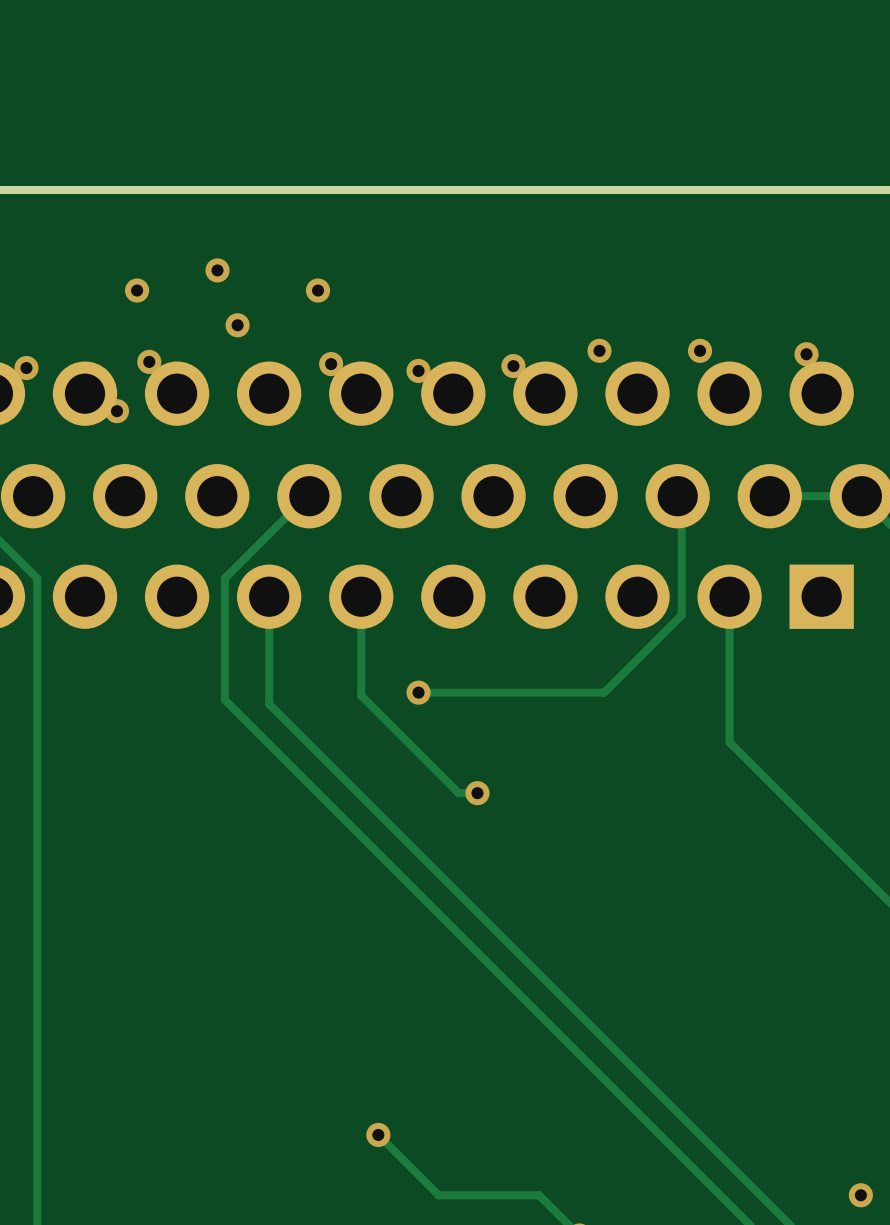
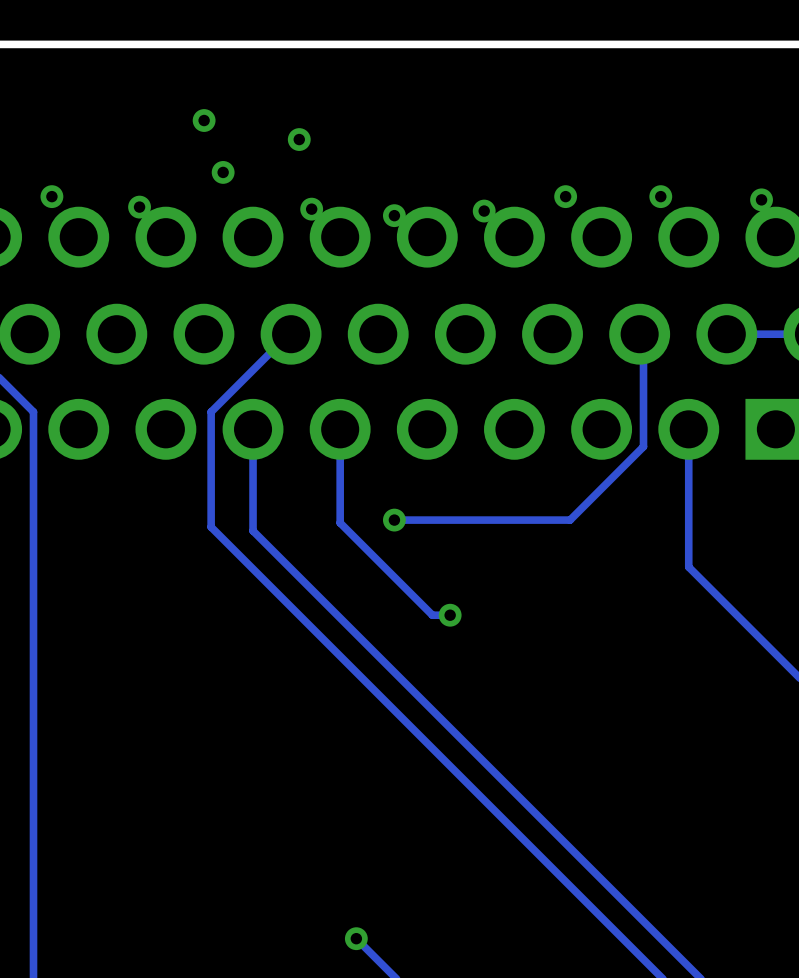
via: (137, 290) -> none
via position: (26, 368) -> (51, 196)
via: (116, 411) -> none

